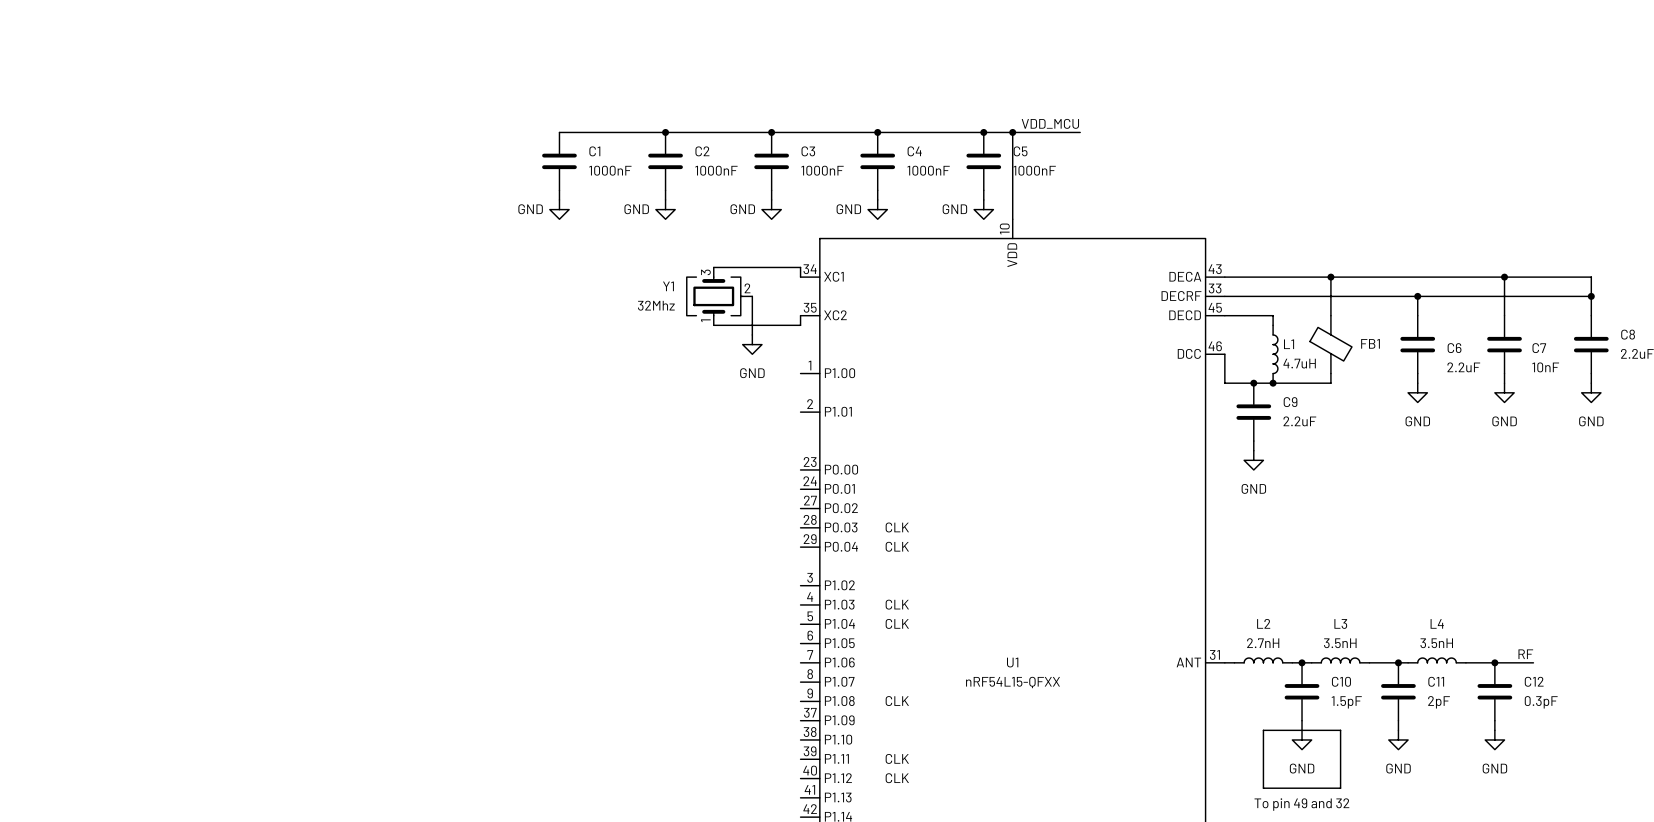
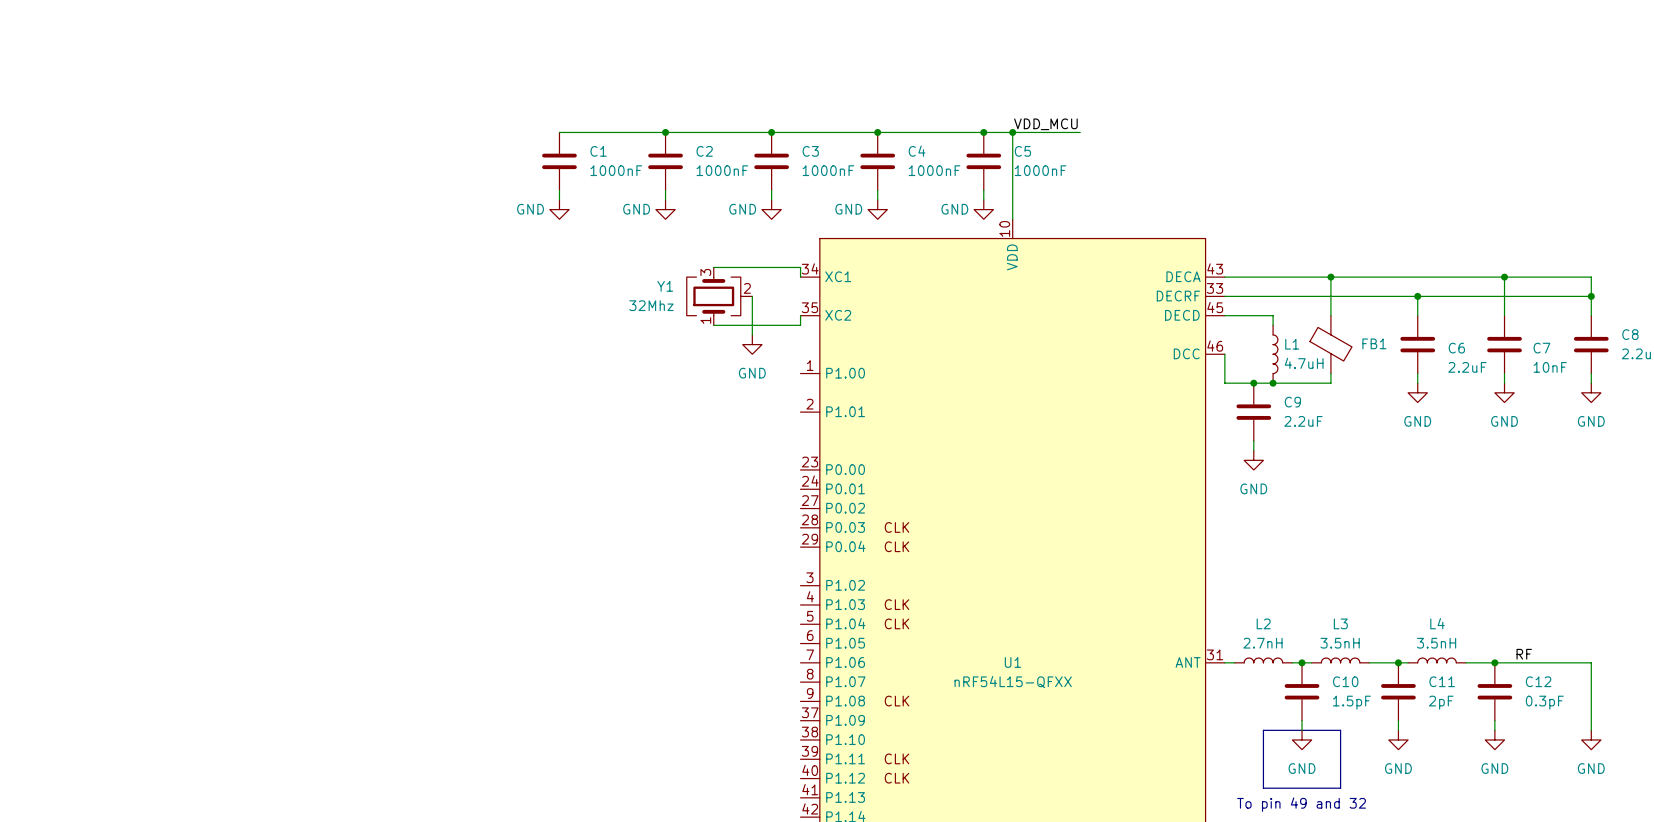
wire: none -> (1533, 662) (1591, 662) (1591, 730)
power symbol: none -> GND (1591, 739)

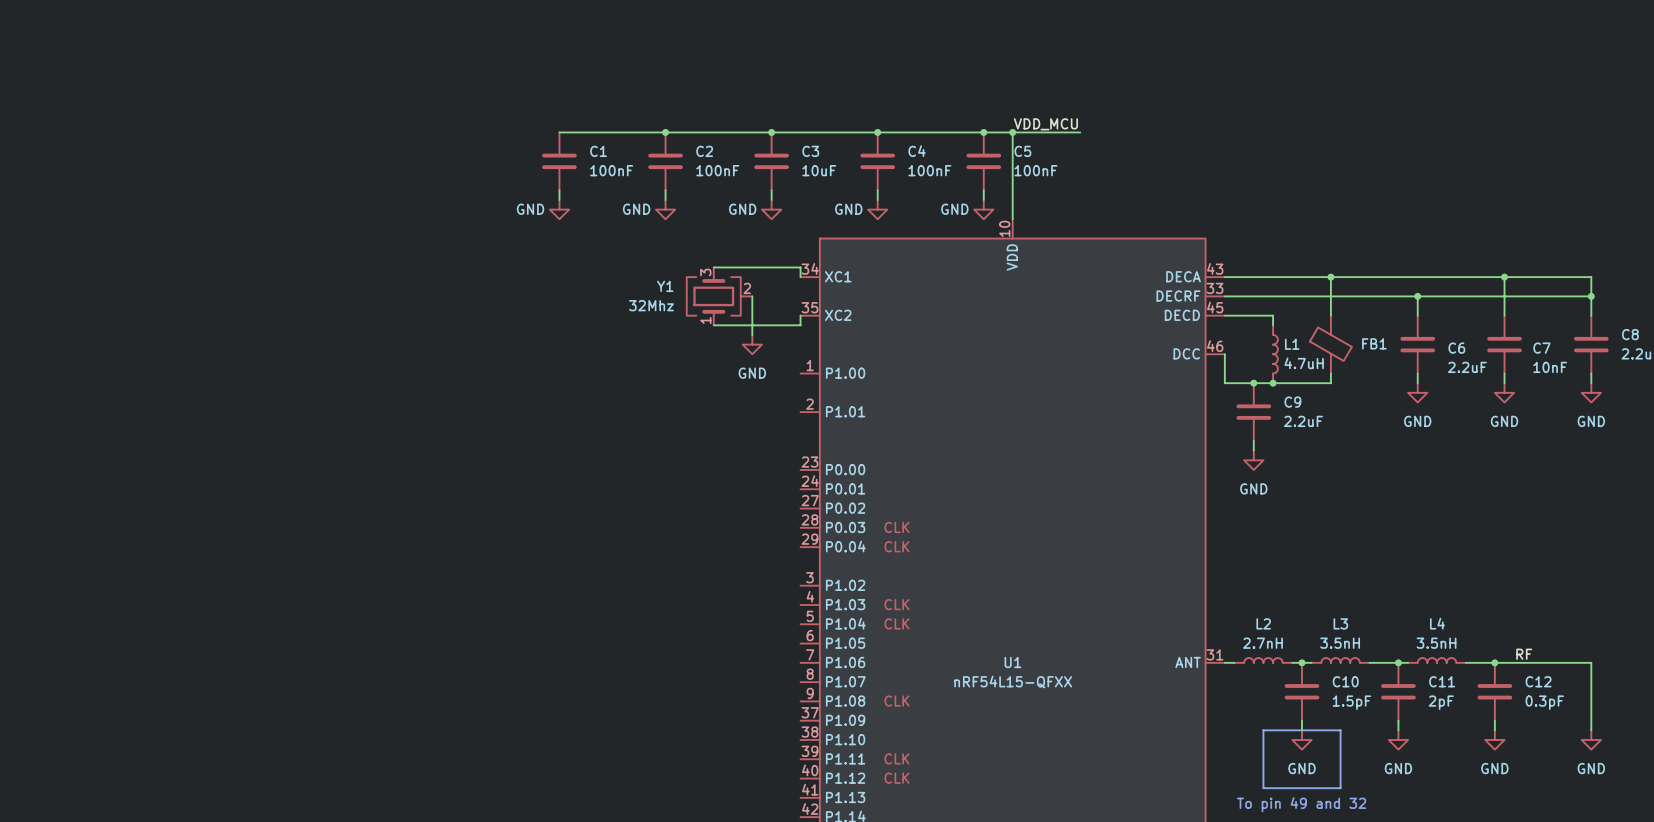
C1 value: 1000nF (616, 170) -> 100nF (611, 170)
C2 value: 1000nF (722, 170) -> 100nF (717, 170)
C3 value: 1000nF (828, 170) -> 10uF (819, 170)
C4 value: 1000nF (934, 170) -> 100nF (929, 170)
C5 value: 1000nF (1040, 170) -> 100nF (1035, 170)

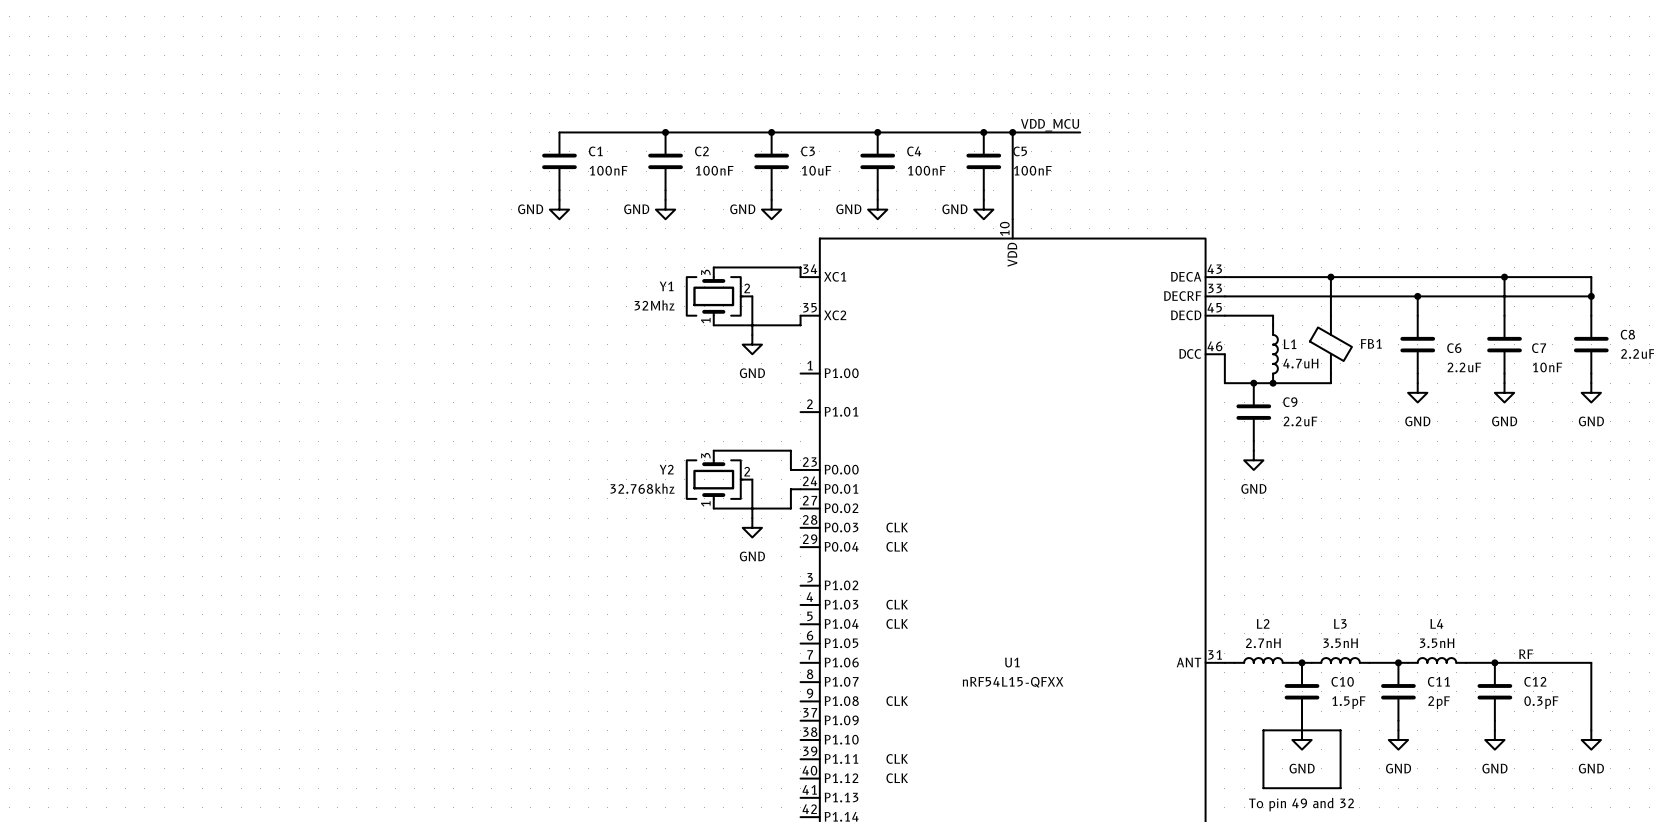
wire: none -> (713, 450) (790, 450) (790, 469) (800, 469)
Y2: none -> 32.768khz (719, 479)
wire: none -> (752, 479) (752, 518)
wire: none -> (800, 489) (790, 489) (790, 508) (713, 508)
power symbol: none -> GND (752, 527)

